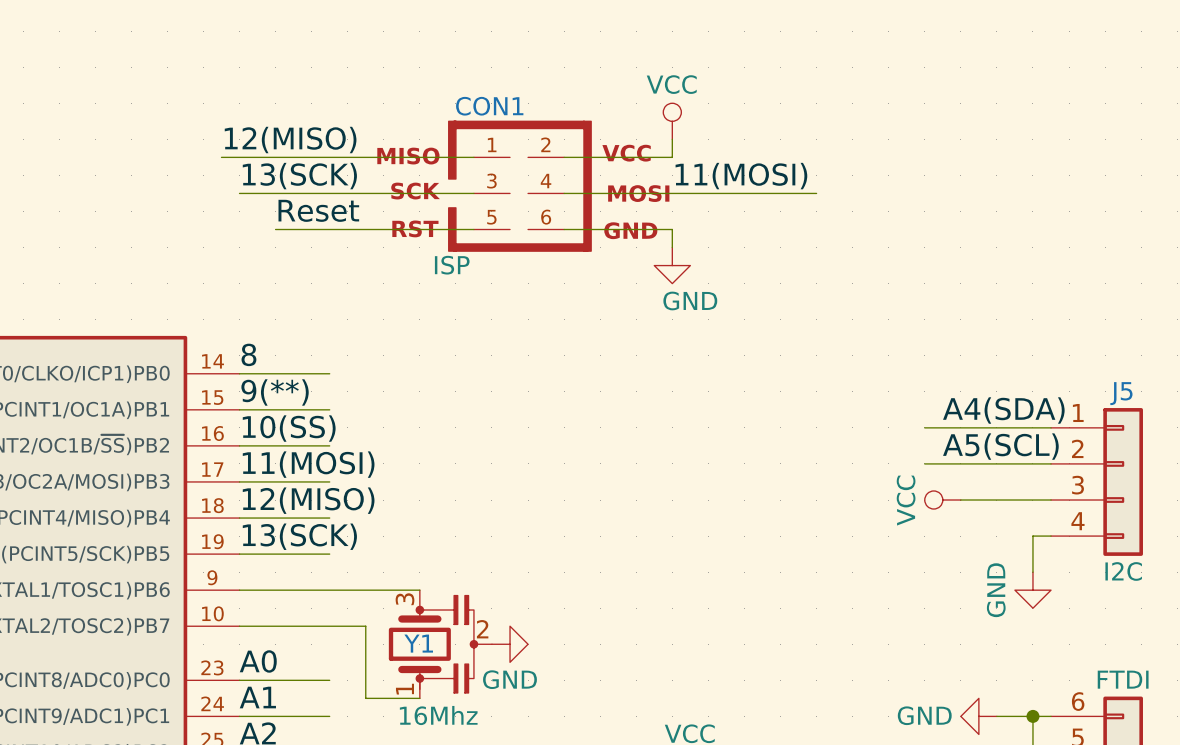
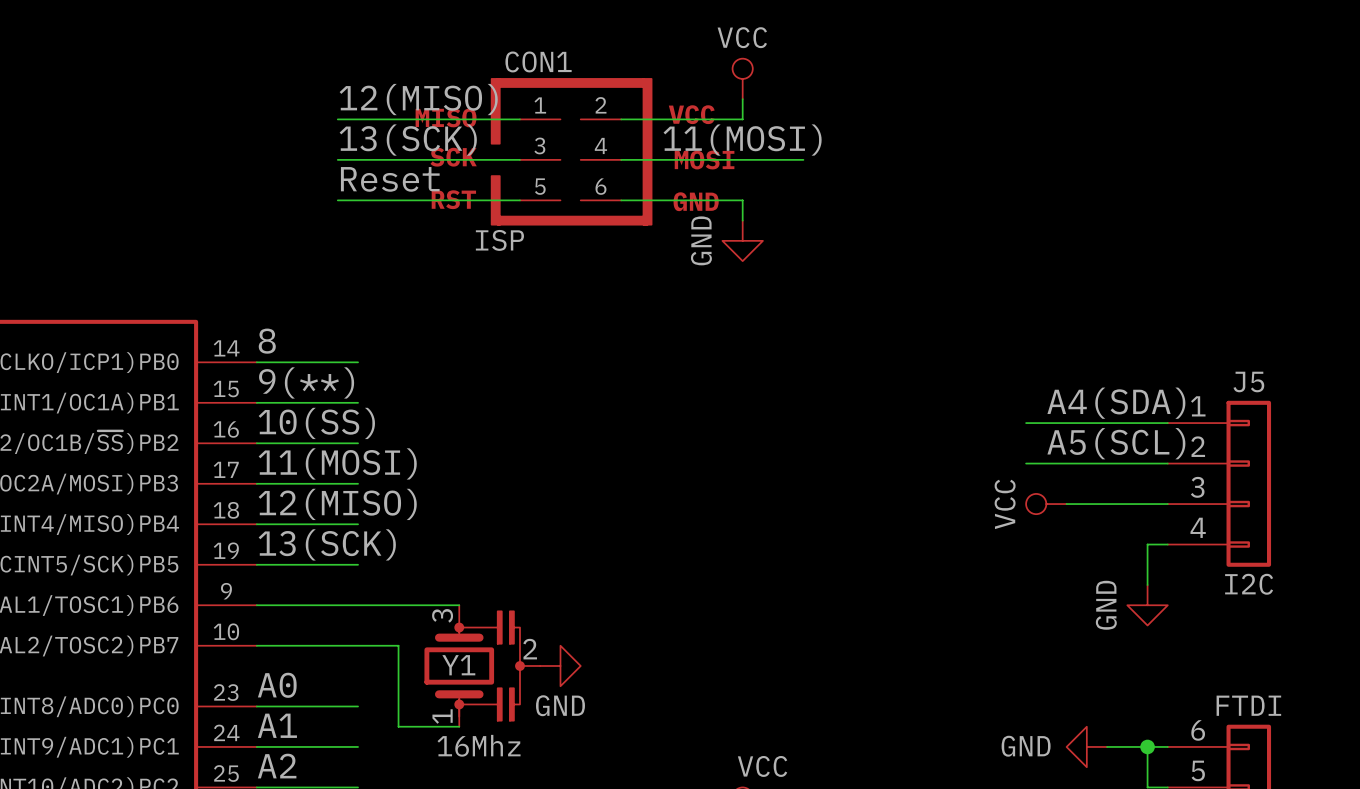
label position: 12(MISO) (290, 140) -> 12(MISO) (418, 99)
wire: (221, 157) (311, 157) -> none
label position: 13(SCK) (299, 176) -> 13(SCK) (408, 140)
label position: 11(MOSI) (741, 176) -> 11(MOSI) (742, 140)
wire: (239, 193) (311, 193) -> none
wire: (726, 193) (816, 193) -> none
label position: Reset (318, 210) -> Reset (390, 179)
wire: (275, 229) (311, 229) -> none
power symbol text rotation: 0° (690, 300) -> 90° counterclockwise (701, 240)

